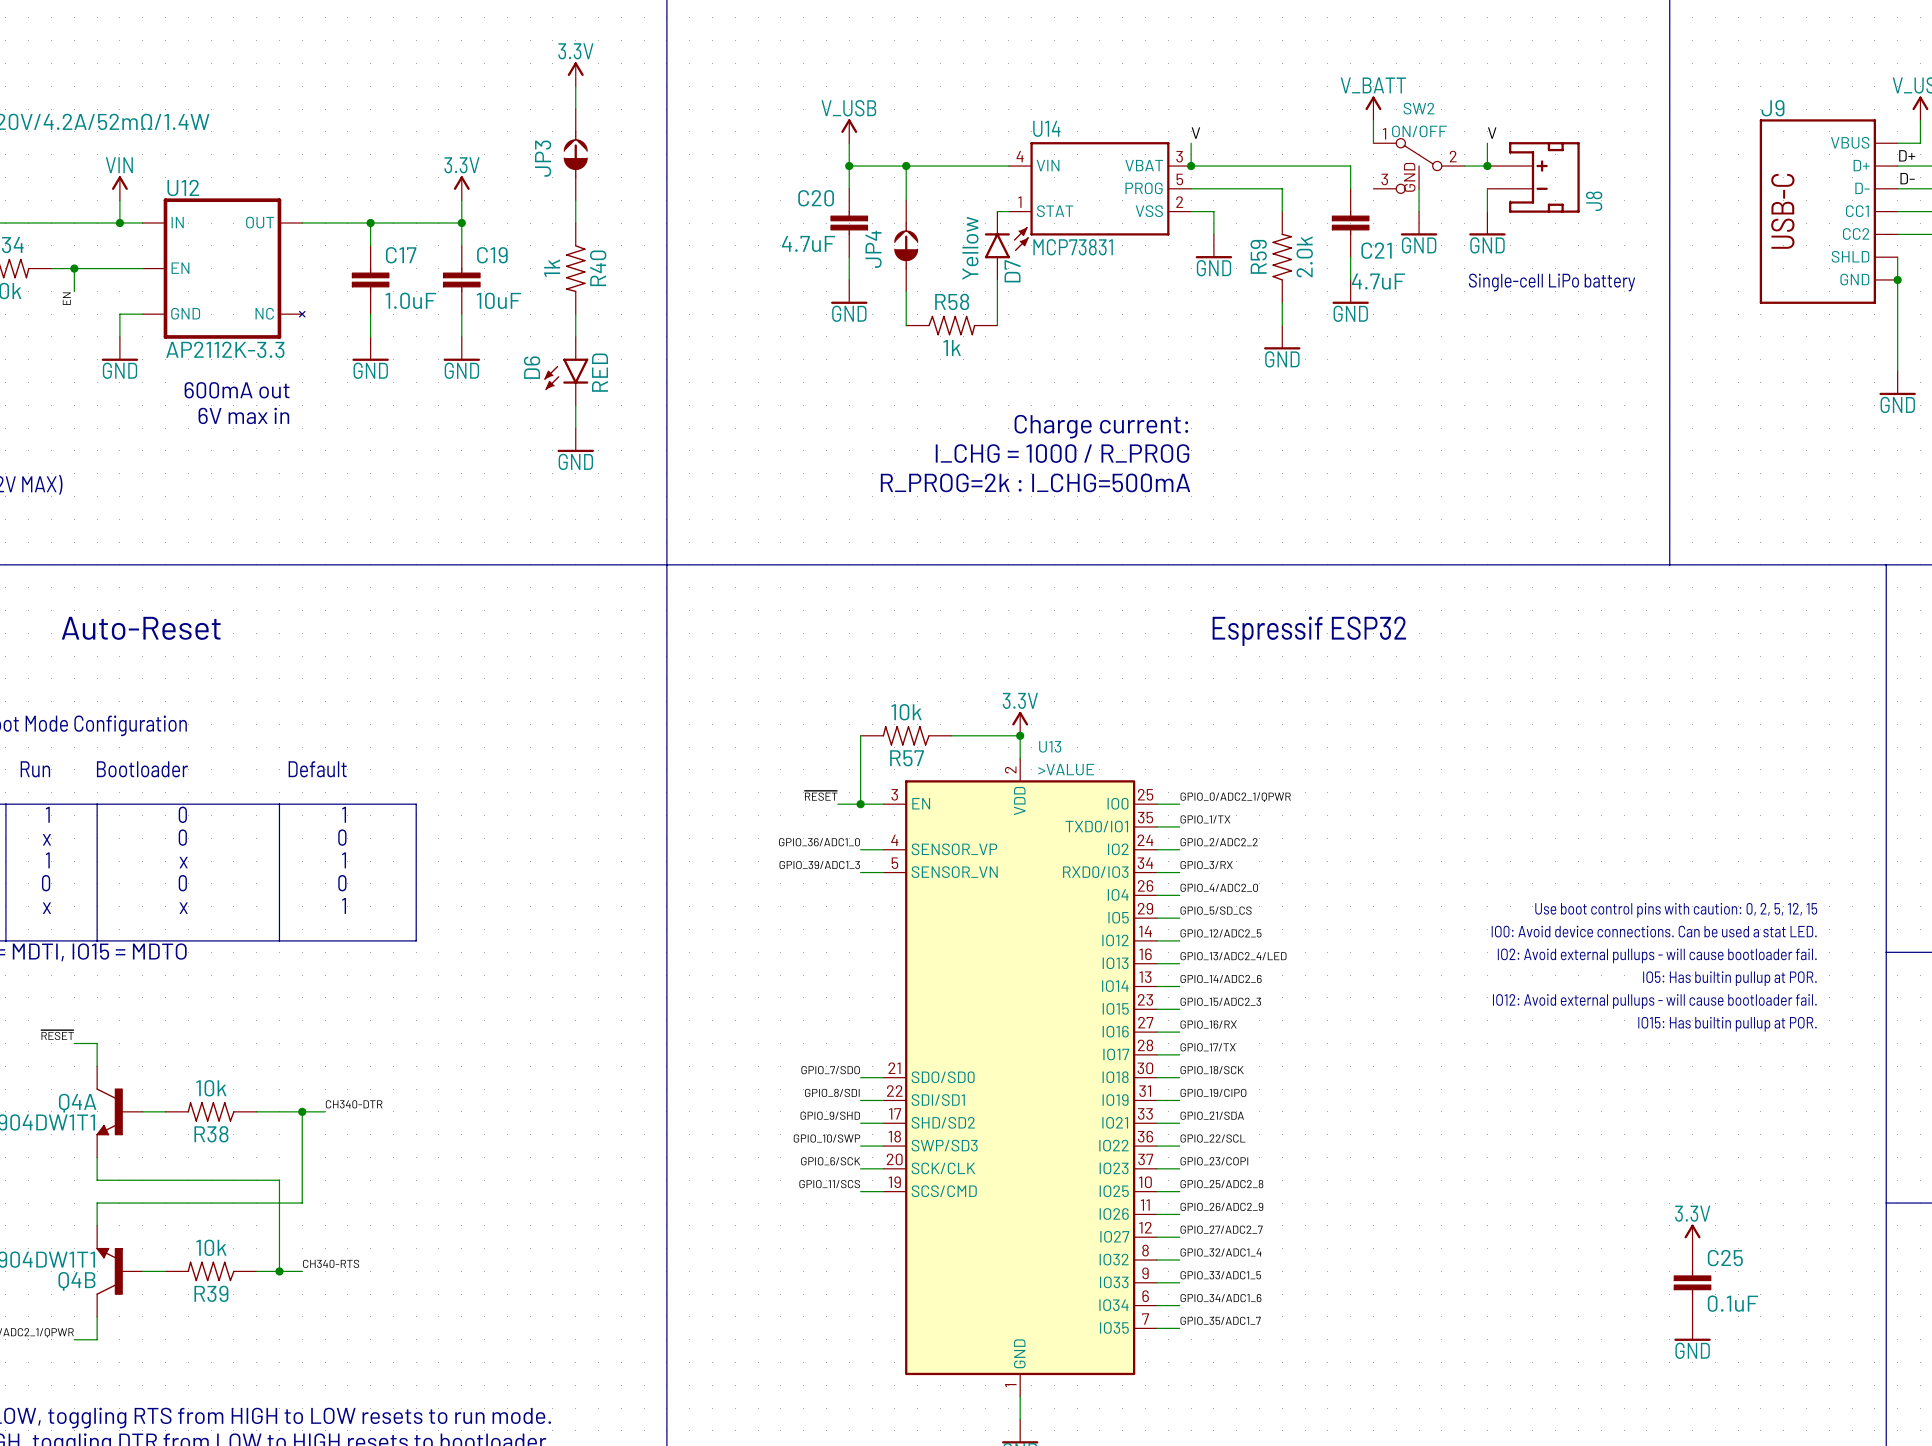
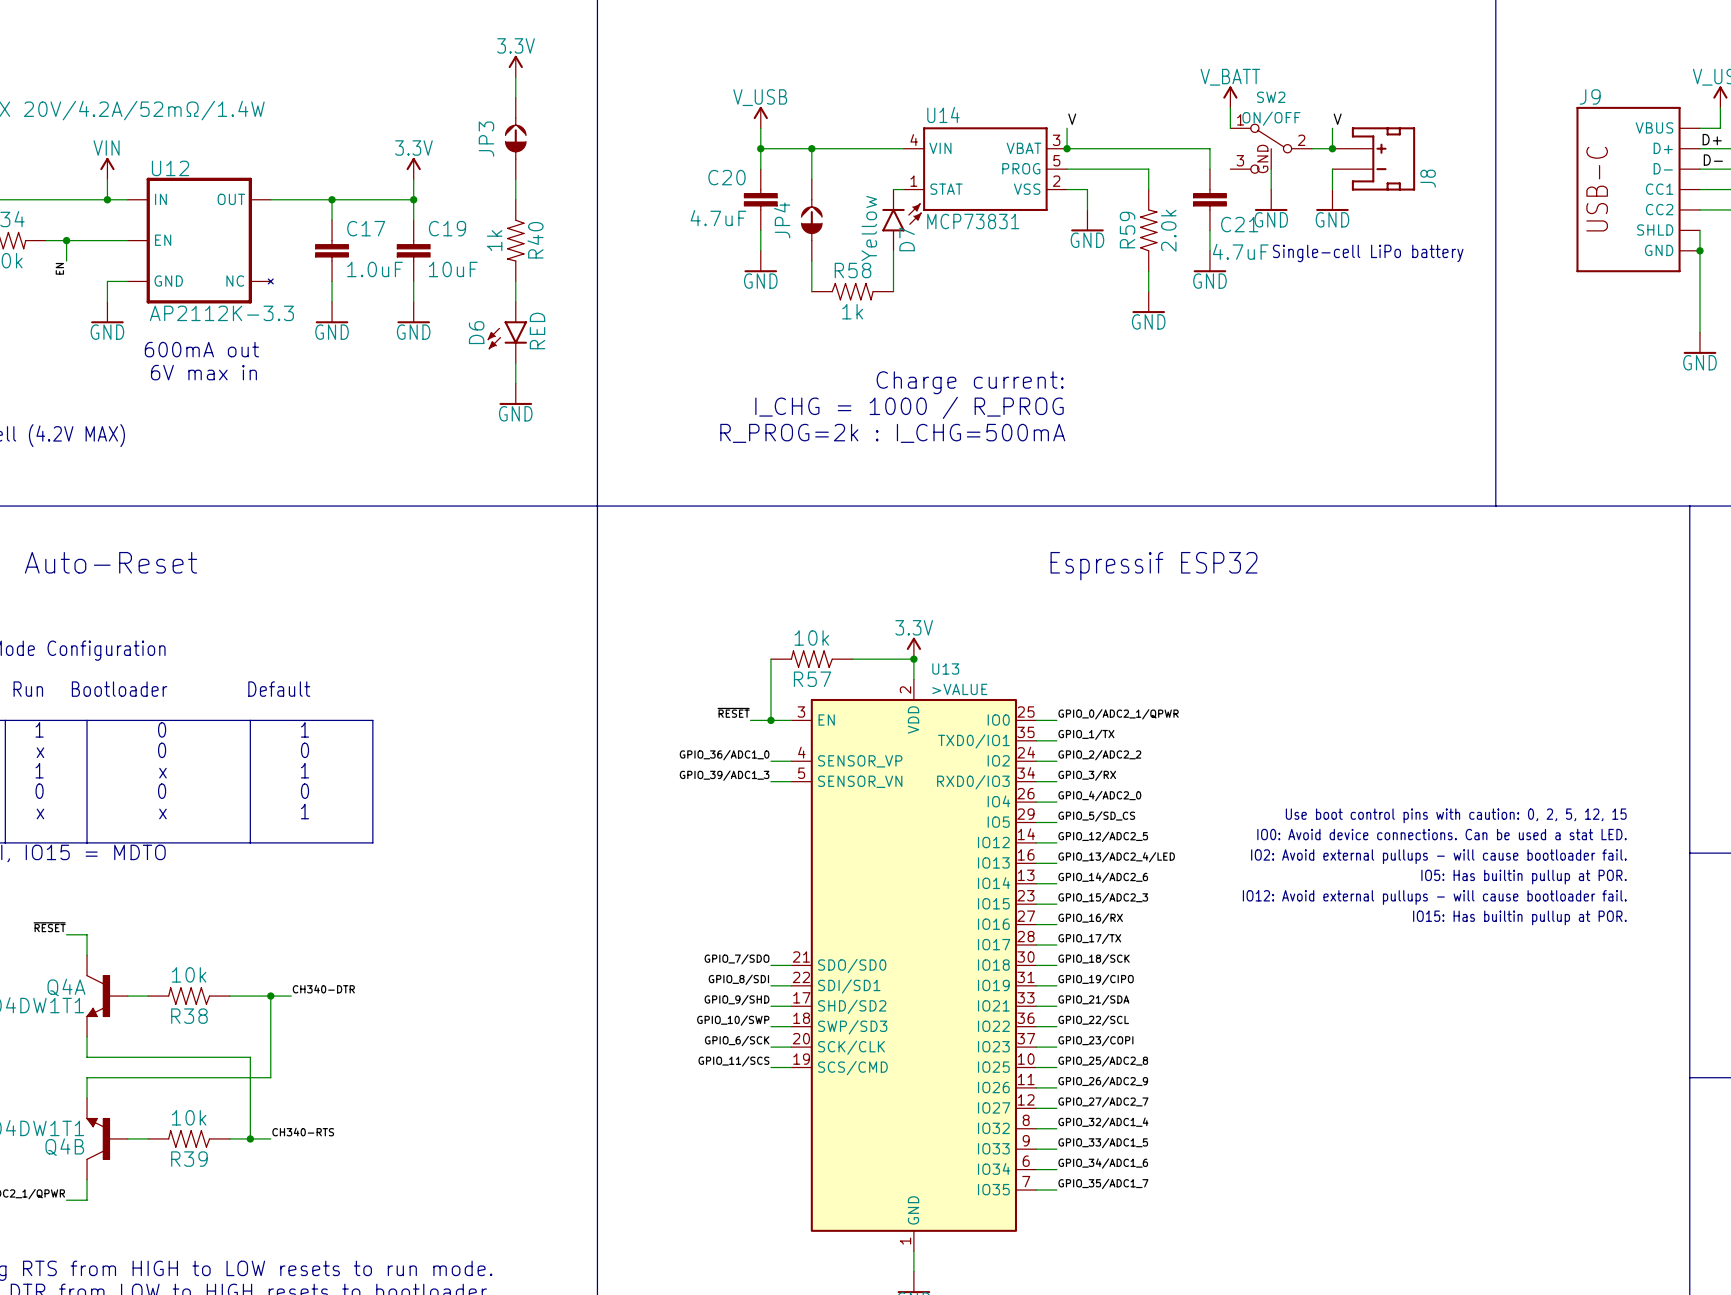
power symbol: 3.3V (1692, 1236) -> none
C25: 0.1uF (1692, 1282) -> none
power symbol: GND (1692, 1328) -> none

